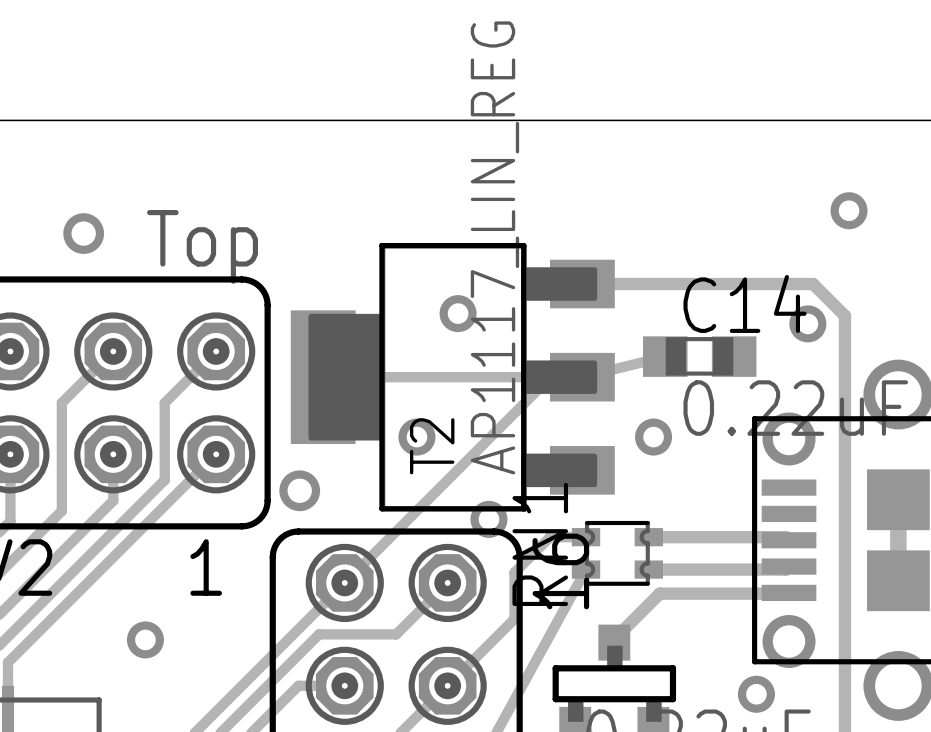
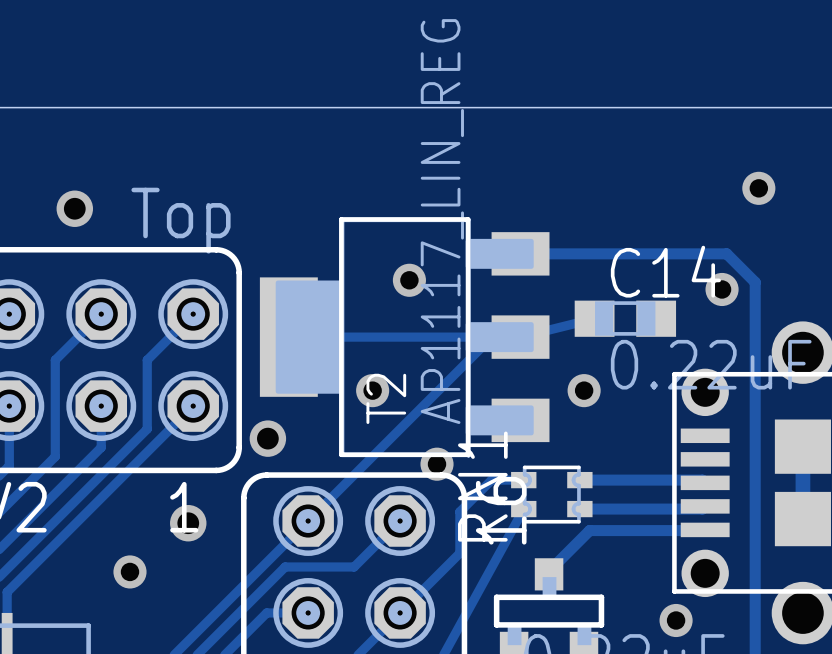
via: none -> (188, 523)

